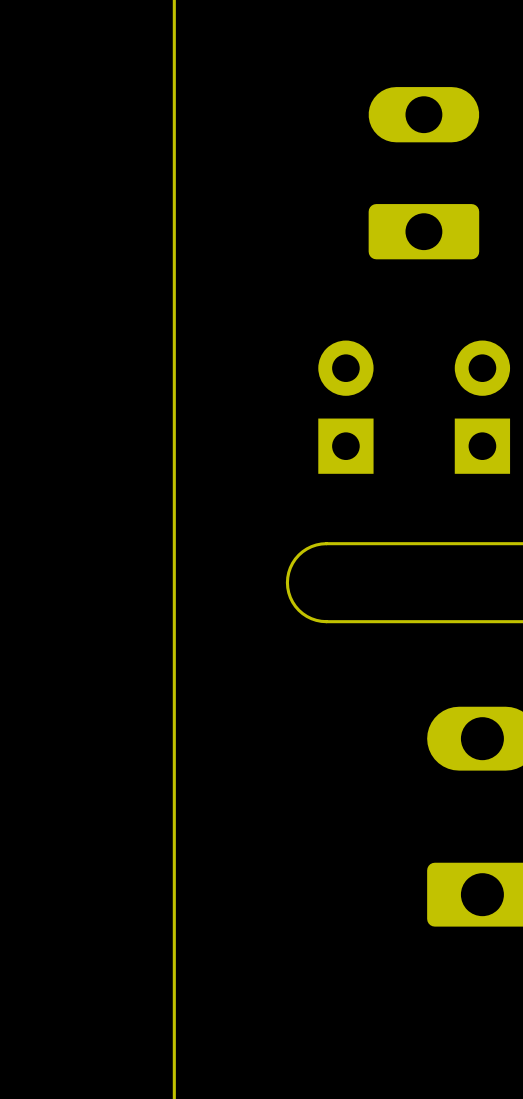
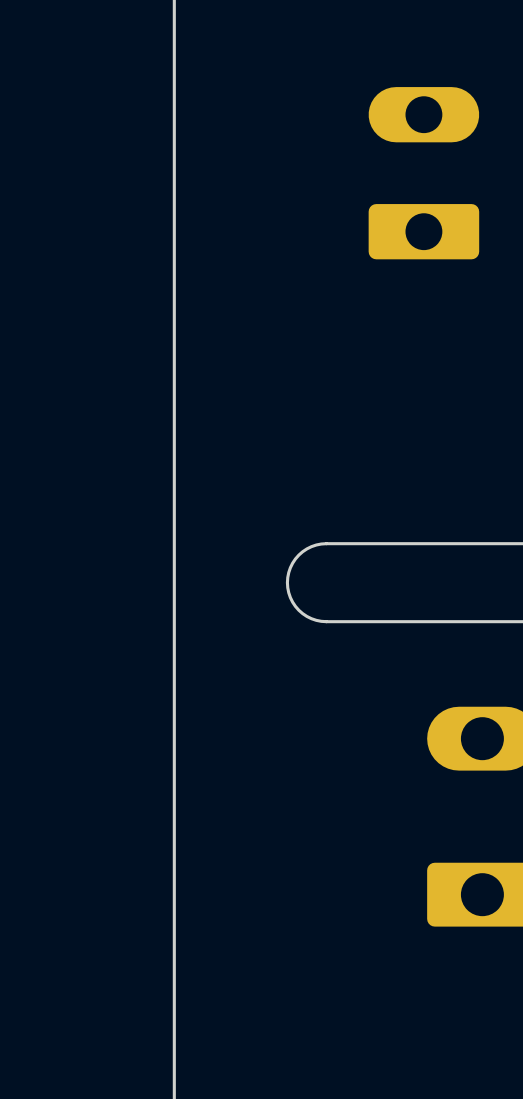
part: (345, 407) -> none
part: (482, 407) -> none

